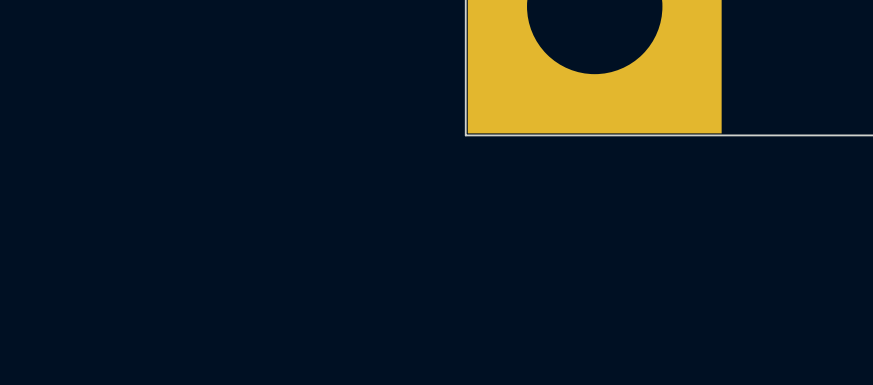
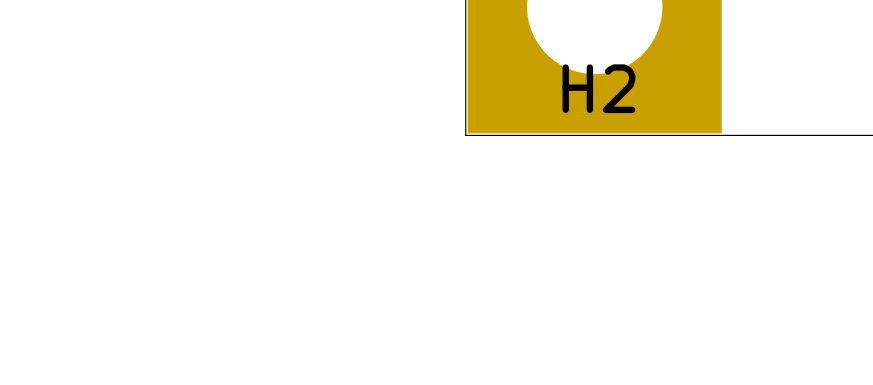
H2 name: none -> H2 (598, 88)

